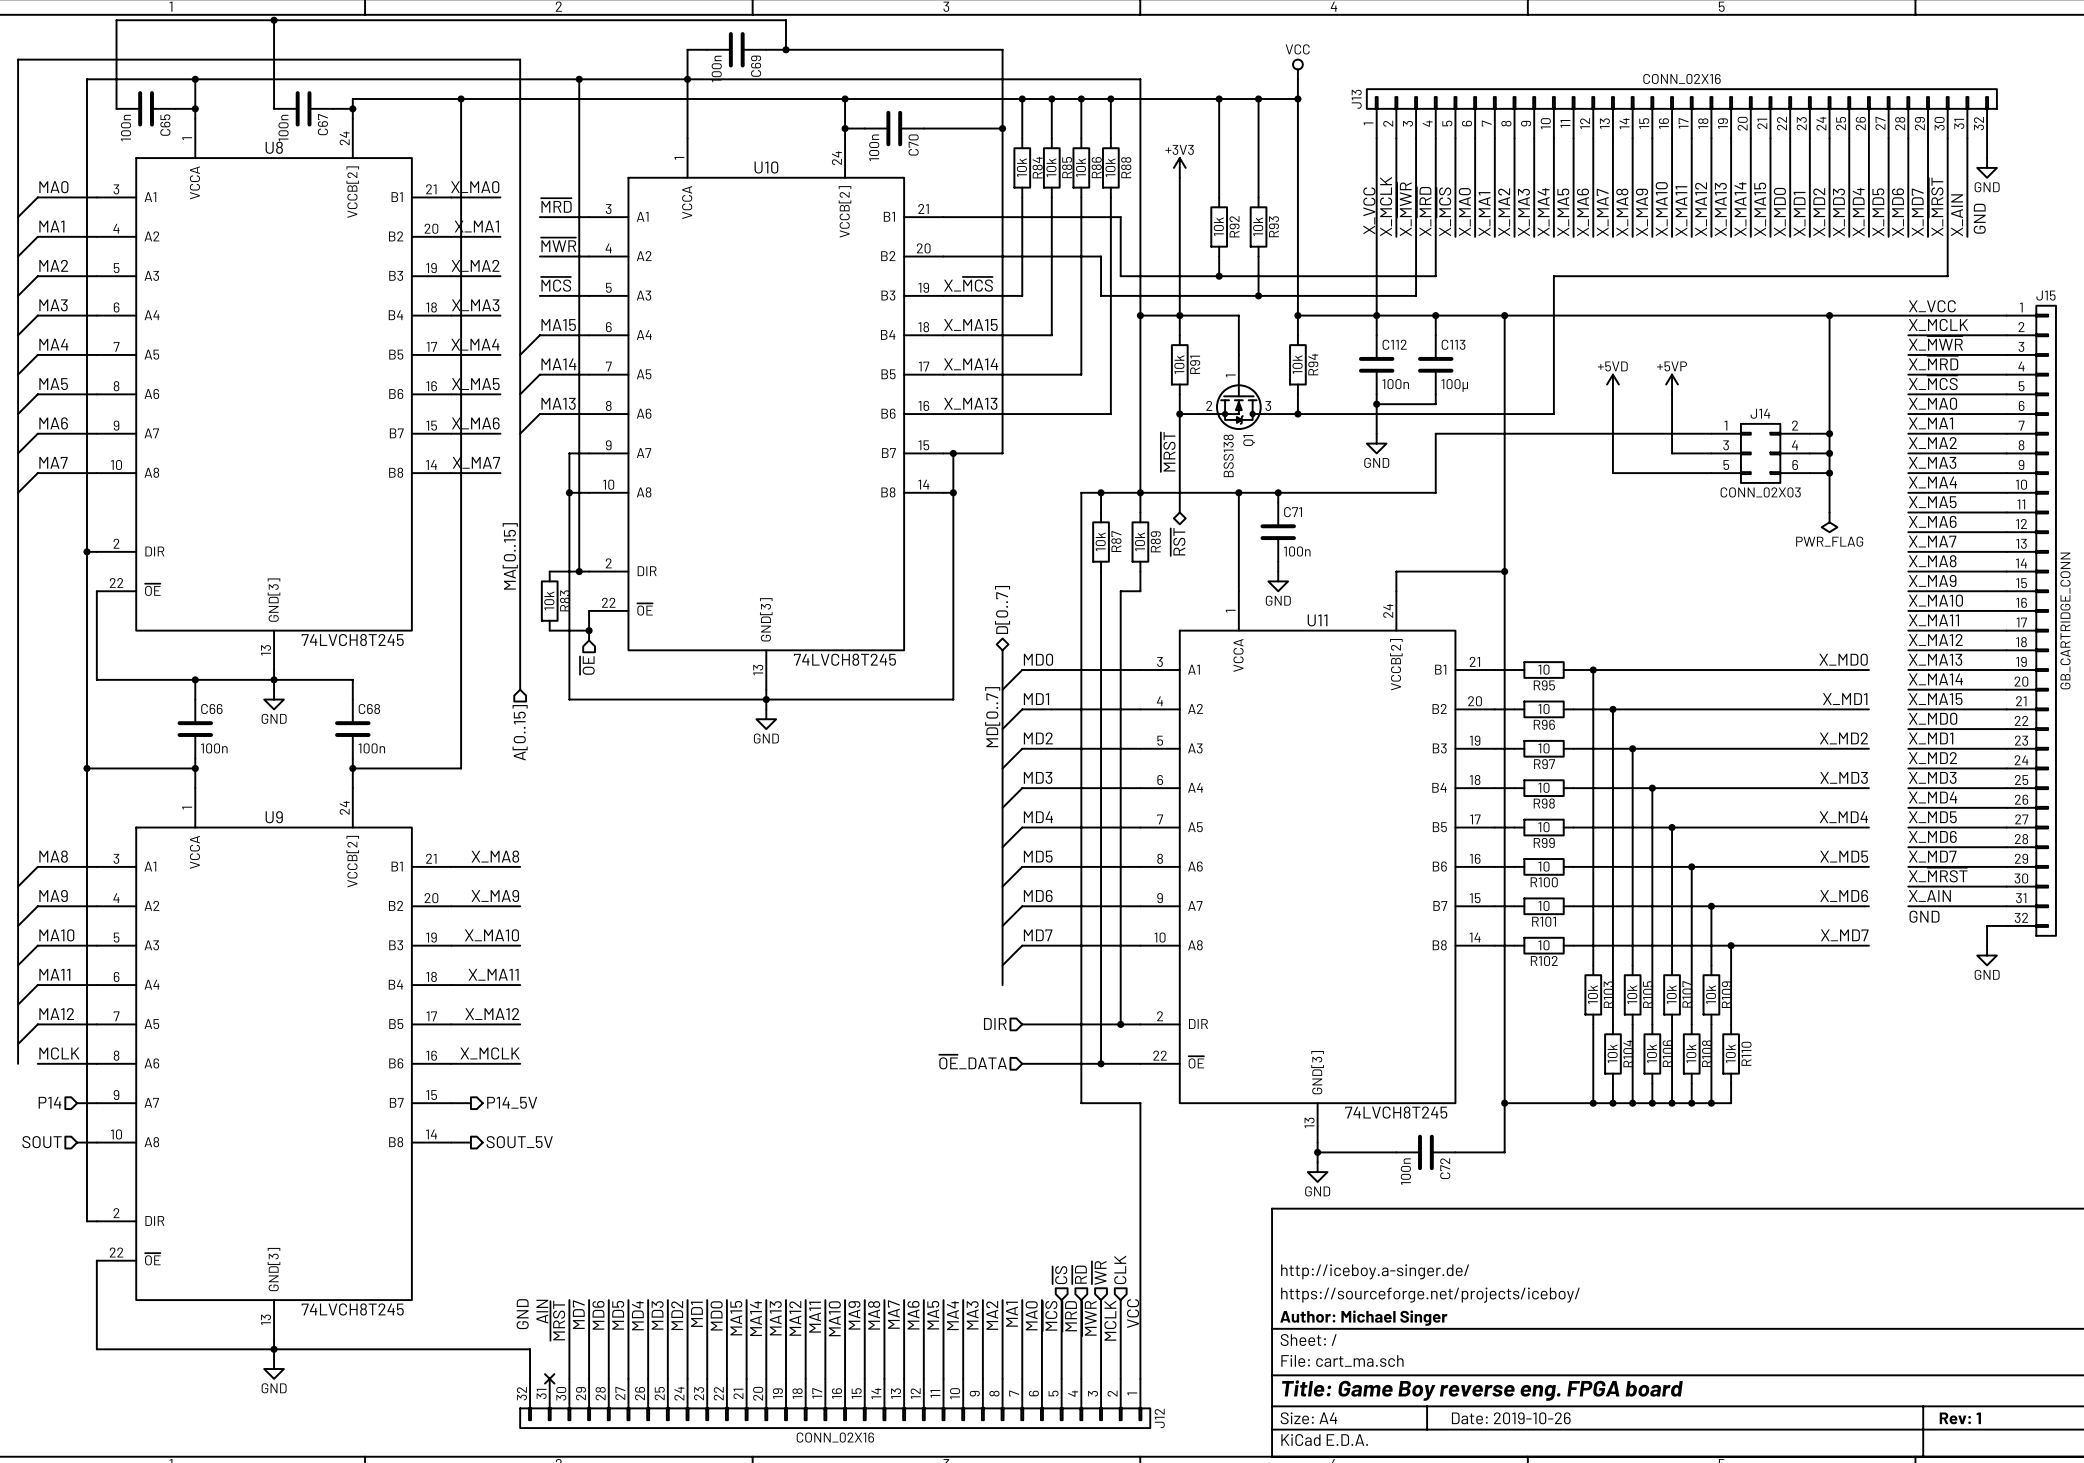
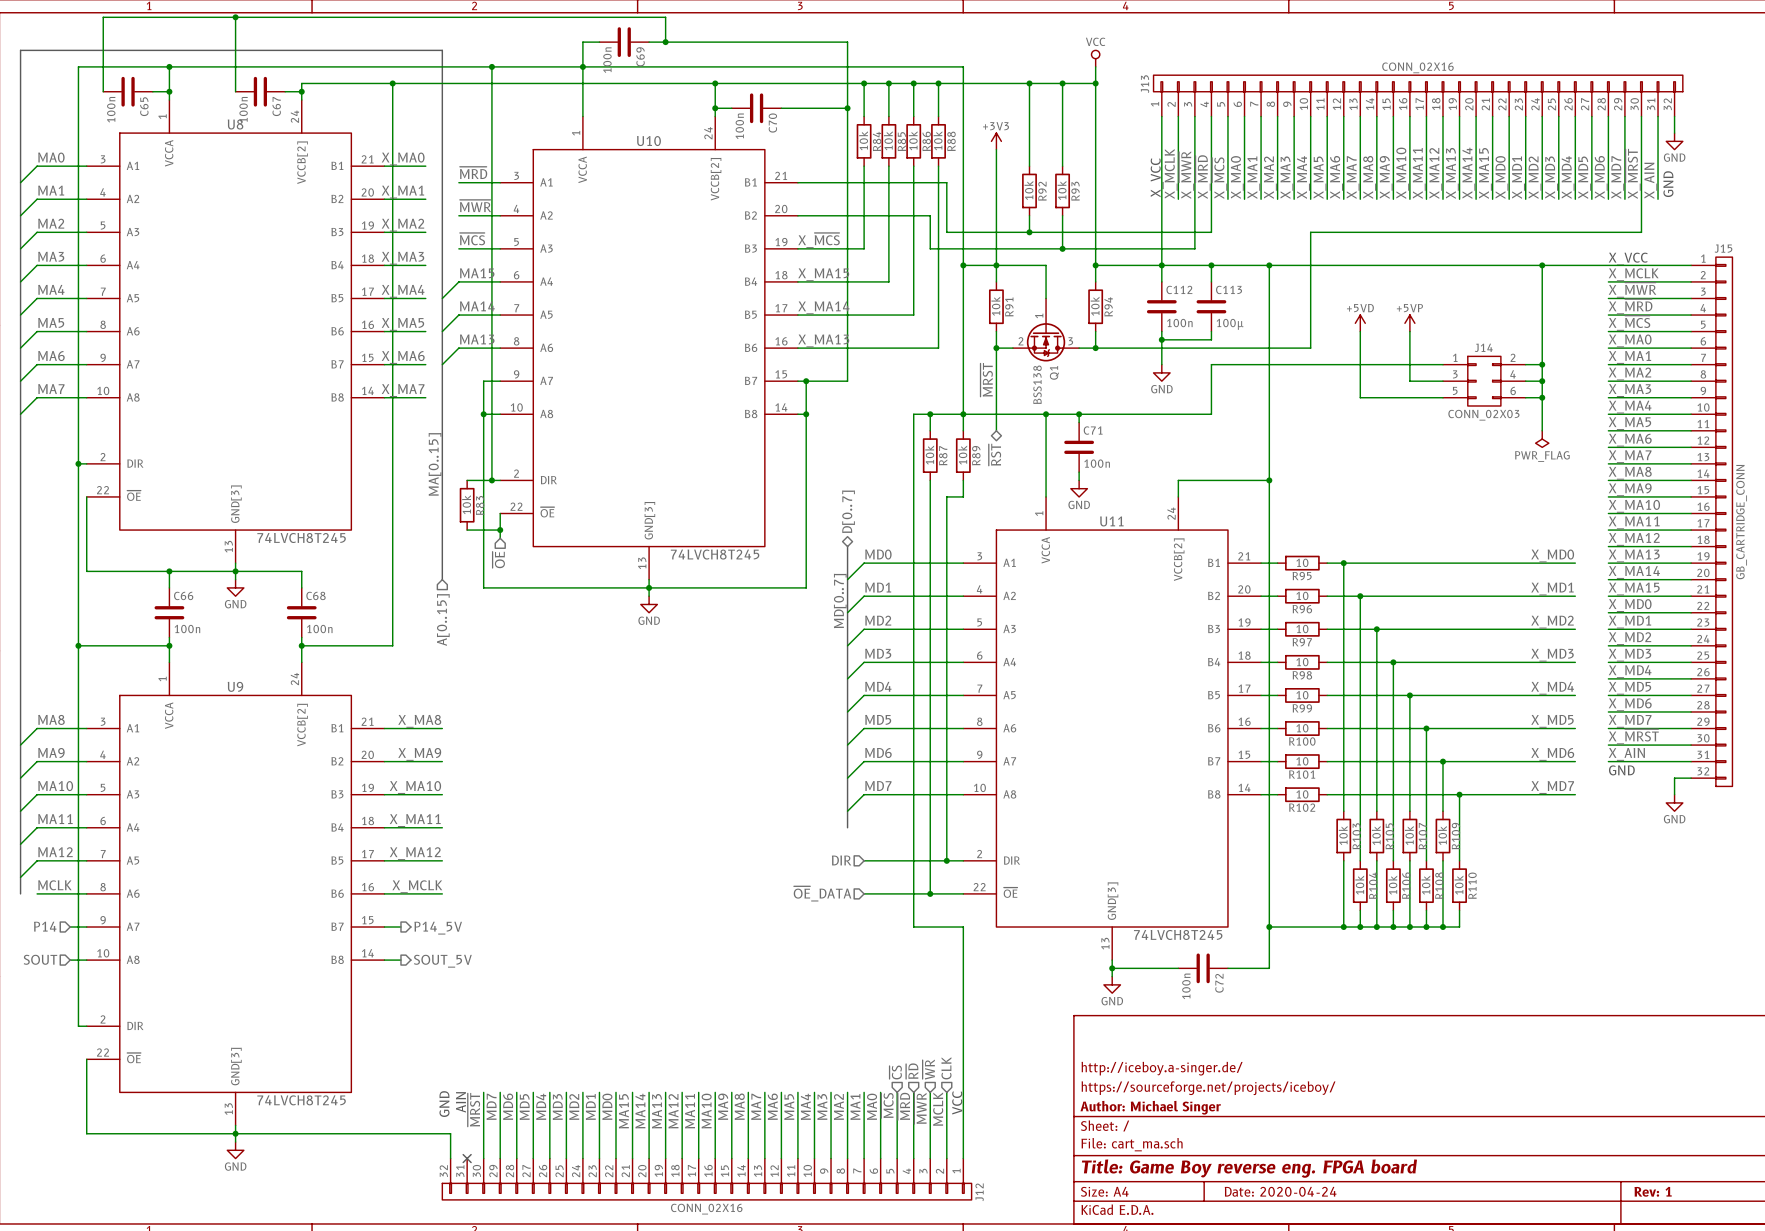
title block: Date: 2019-10-26 (1511, 1418) -> Date: 2020-04-24 (1280, 1191)

